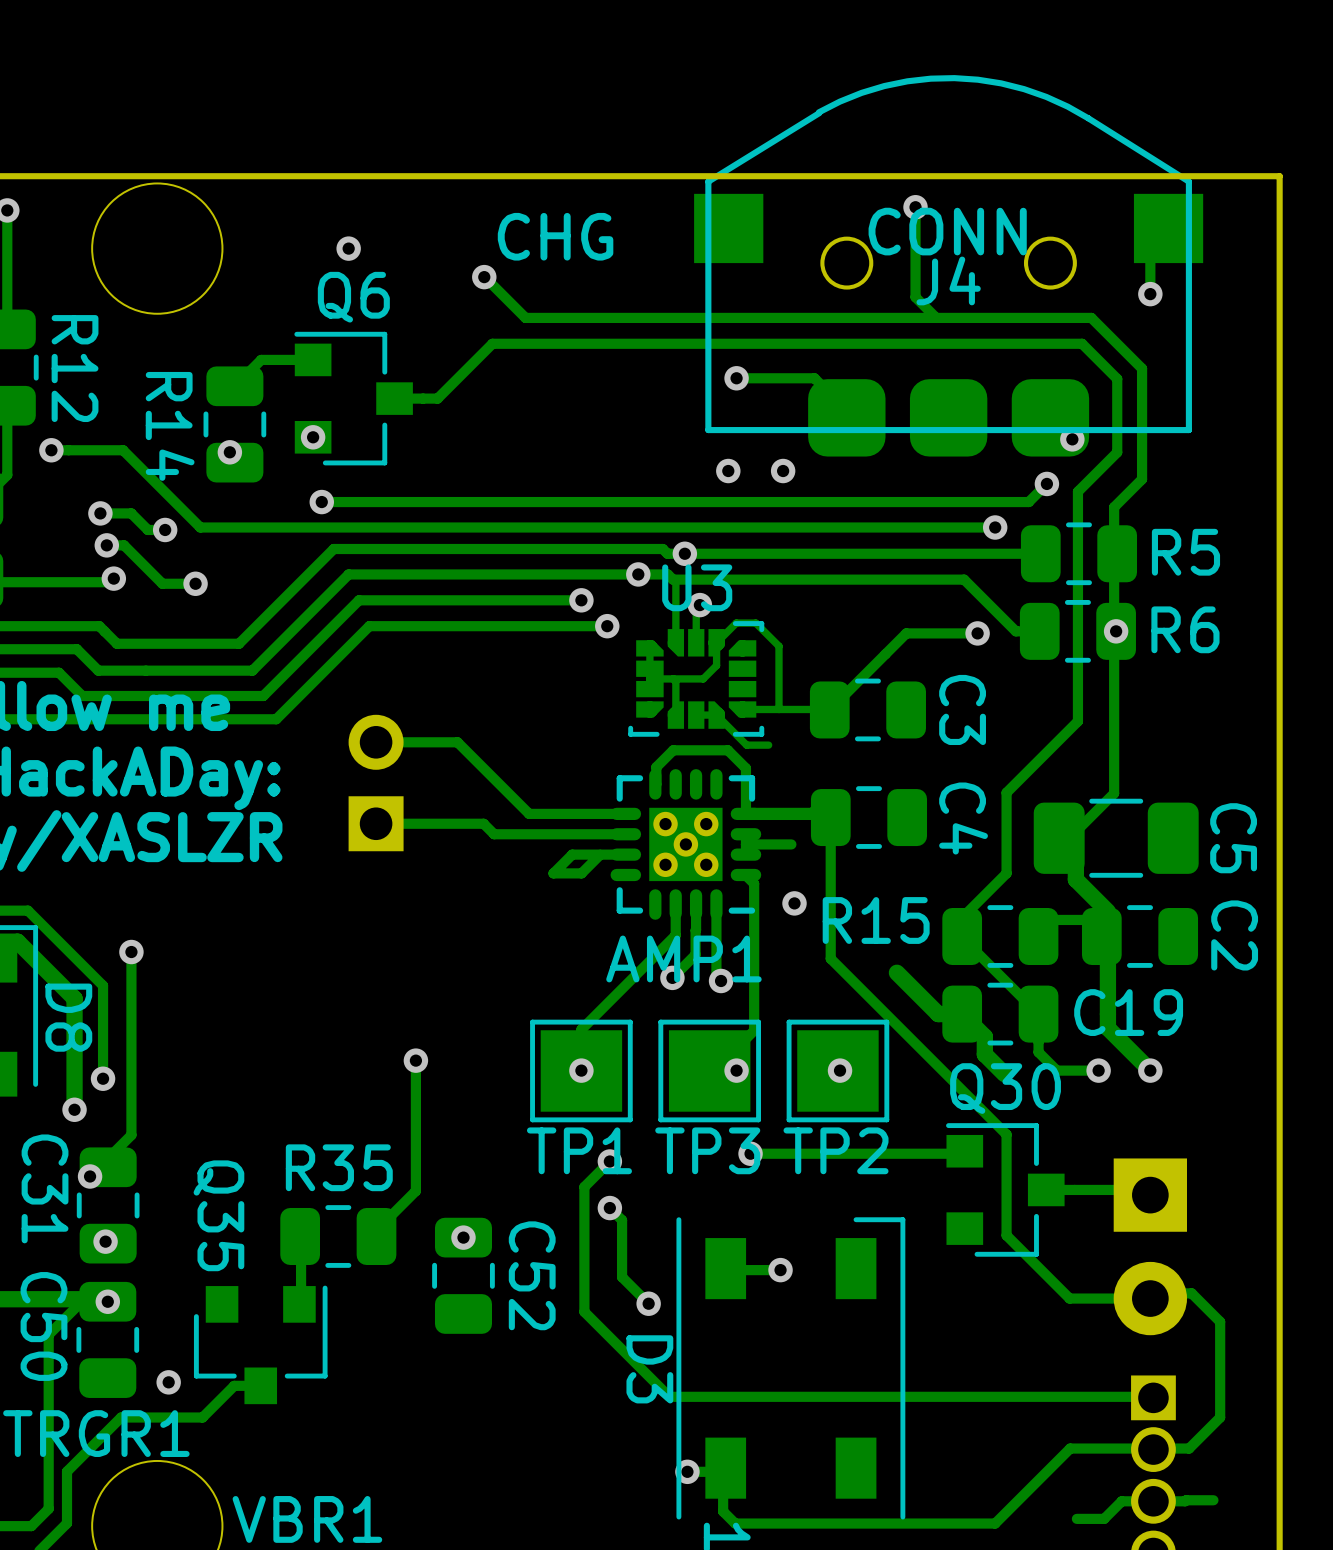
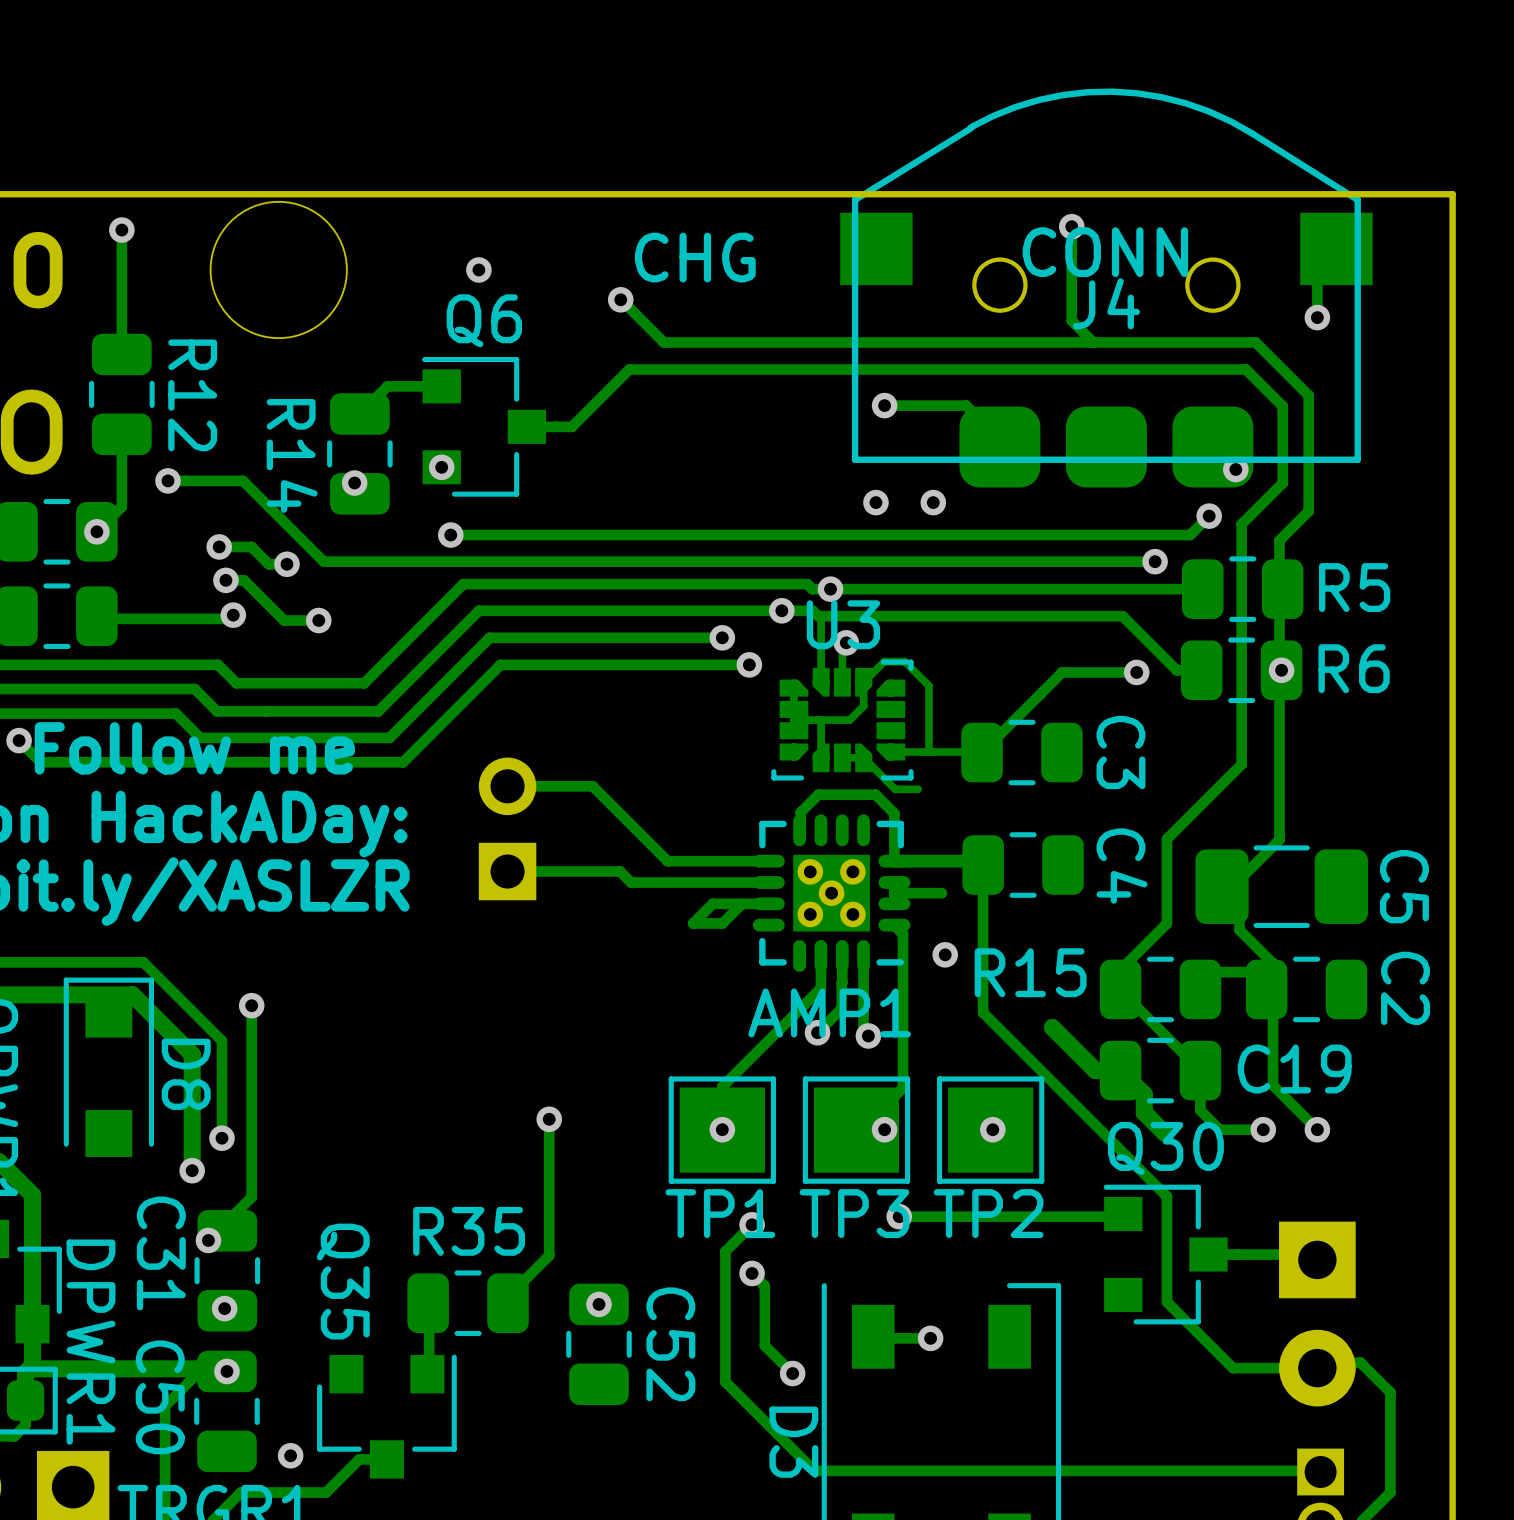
track width: thick (1075, 831) (1075, 879) (1107, 911) -> thin (1239, 879) (1239, 929) (1273, 963)
track width: thick (1107, 957) (1107, 1028) (1150, 1070) -> thin (1273, 1011) (1273, 1085) (1317, 1129)

